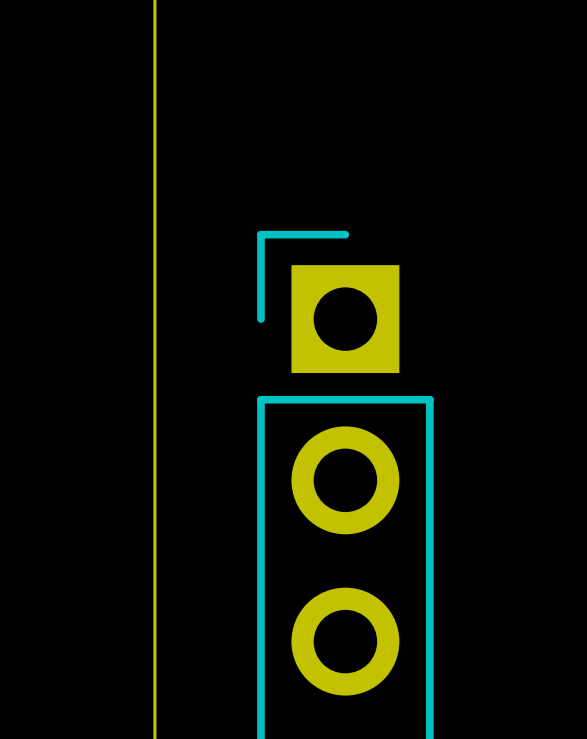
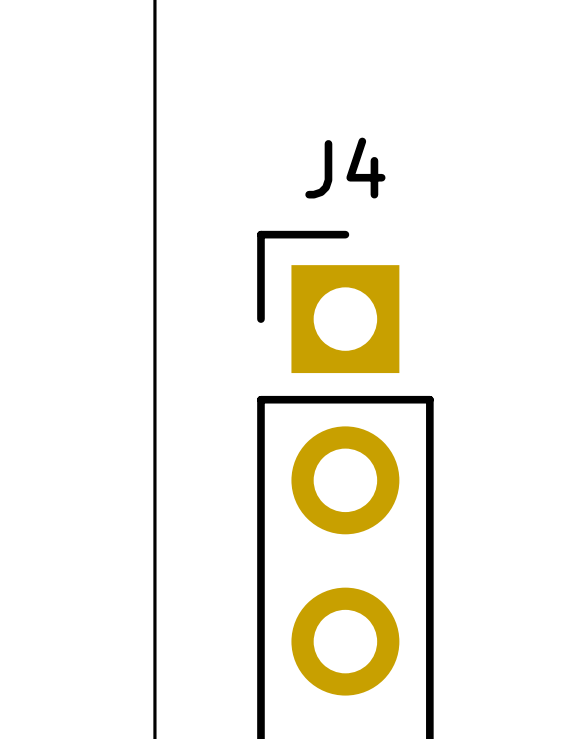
J4 name: none -> J4 (345, 168)

